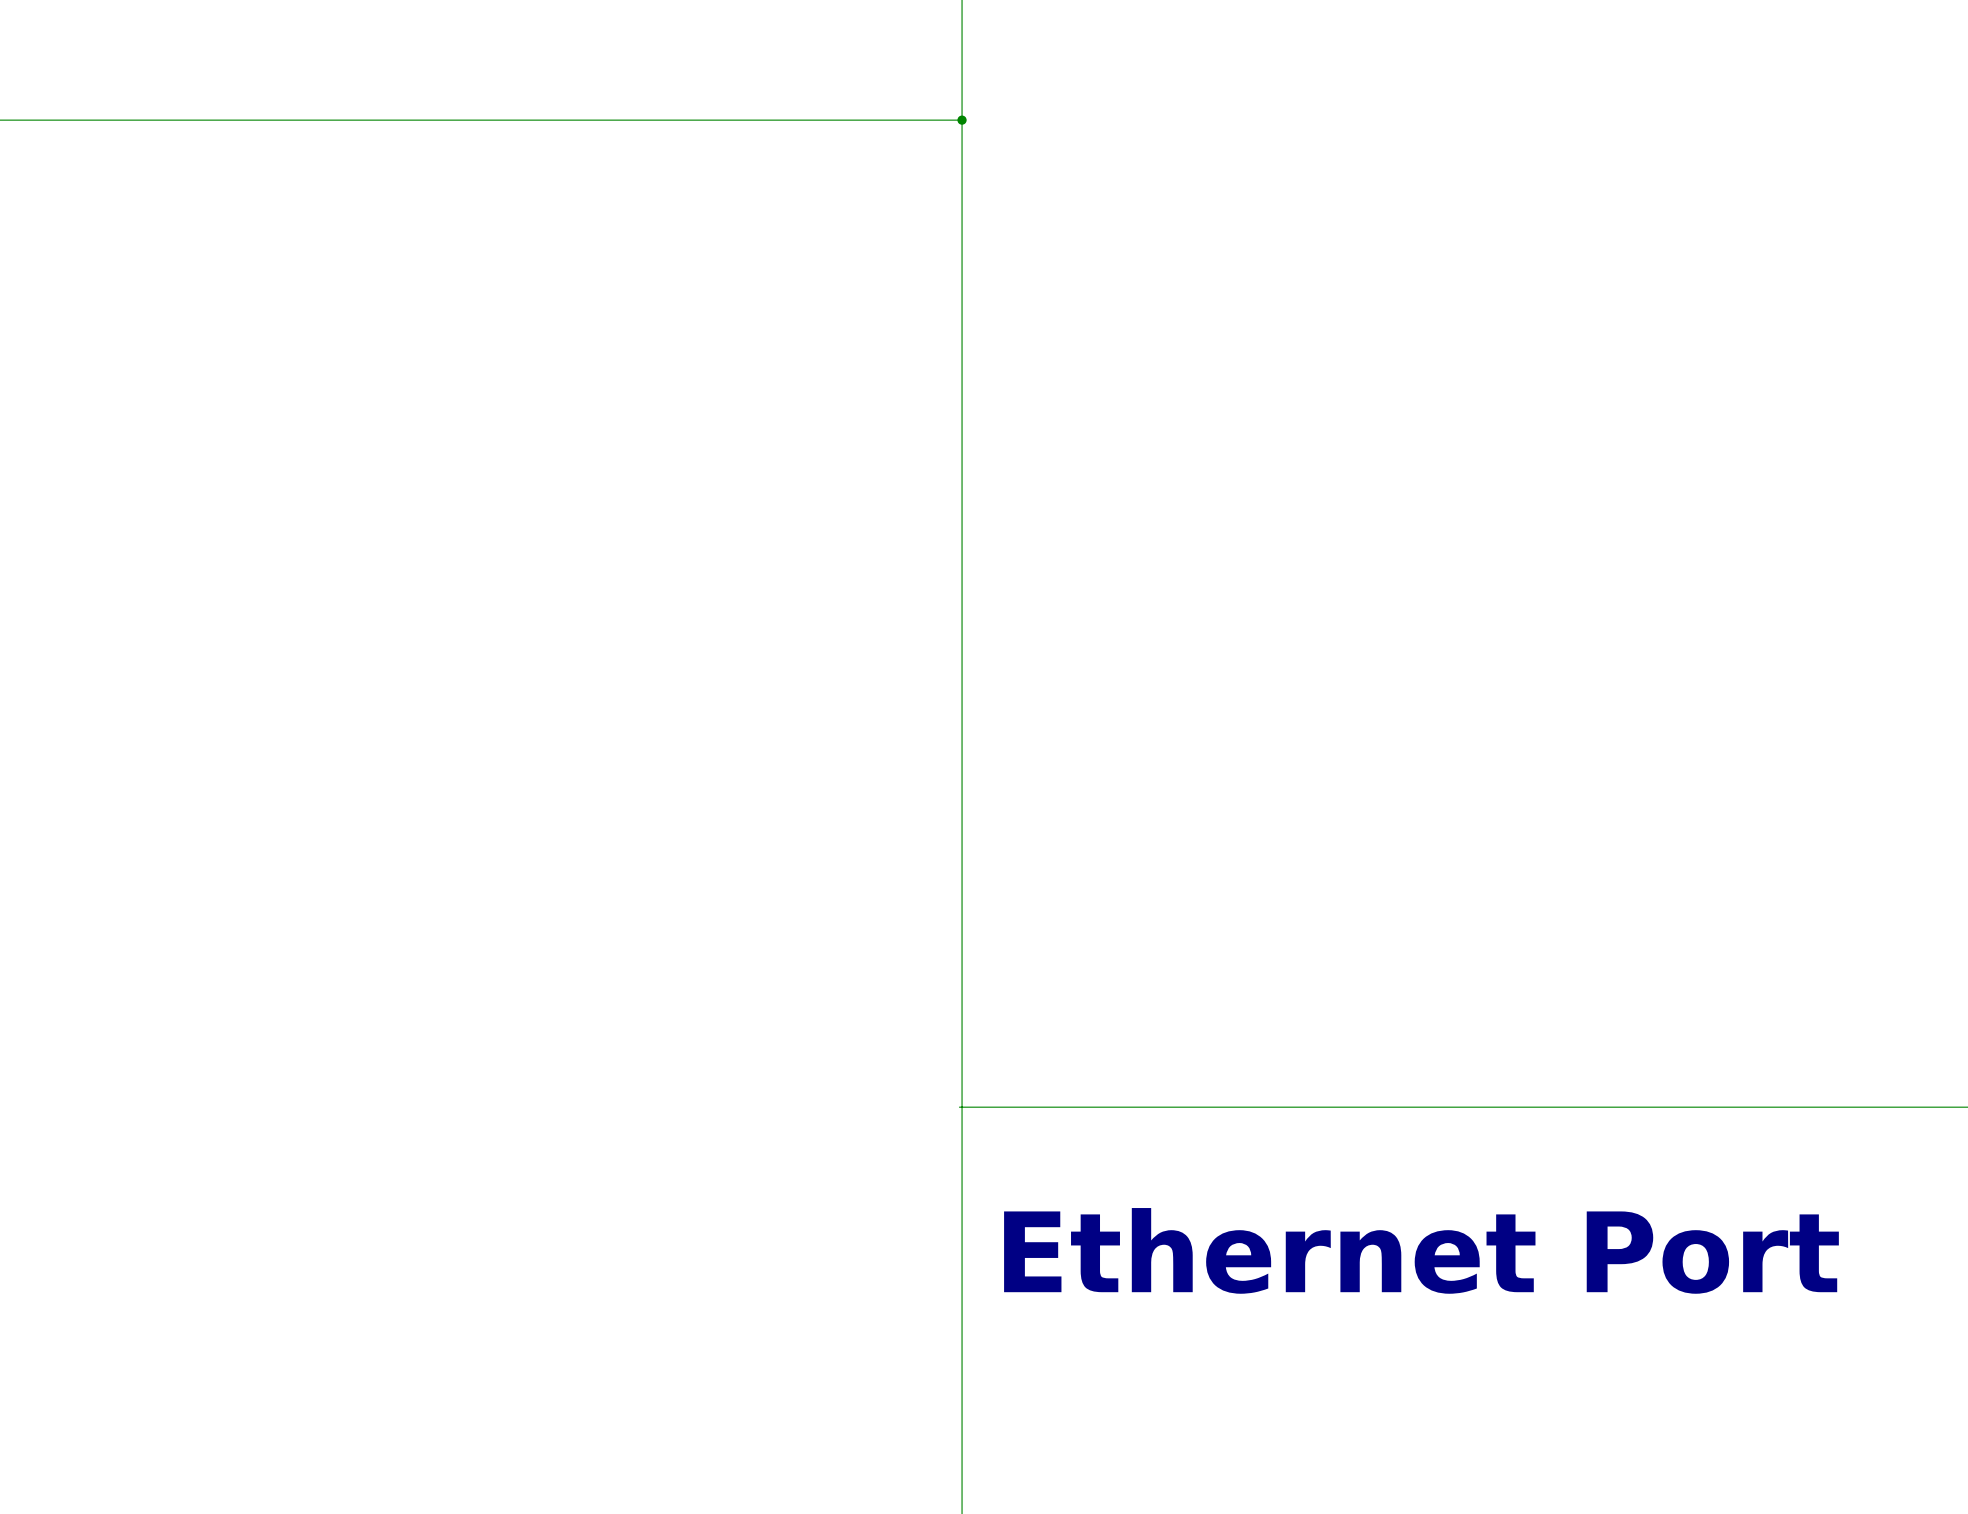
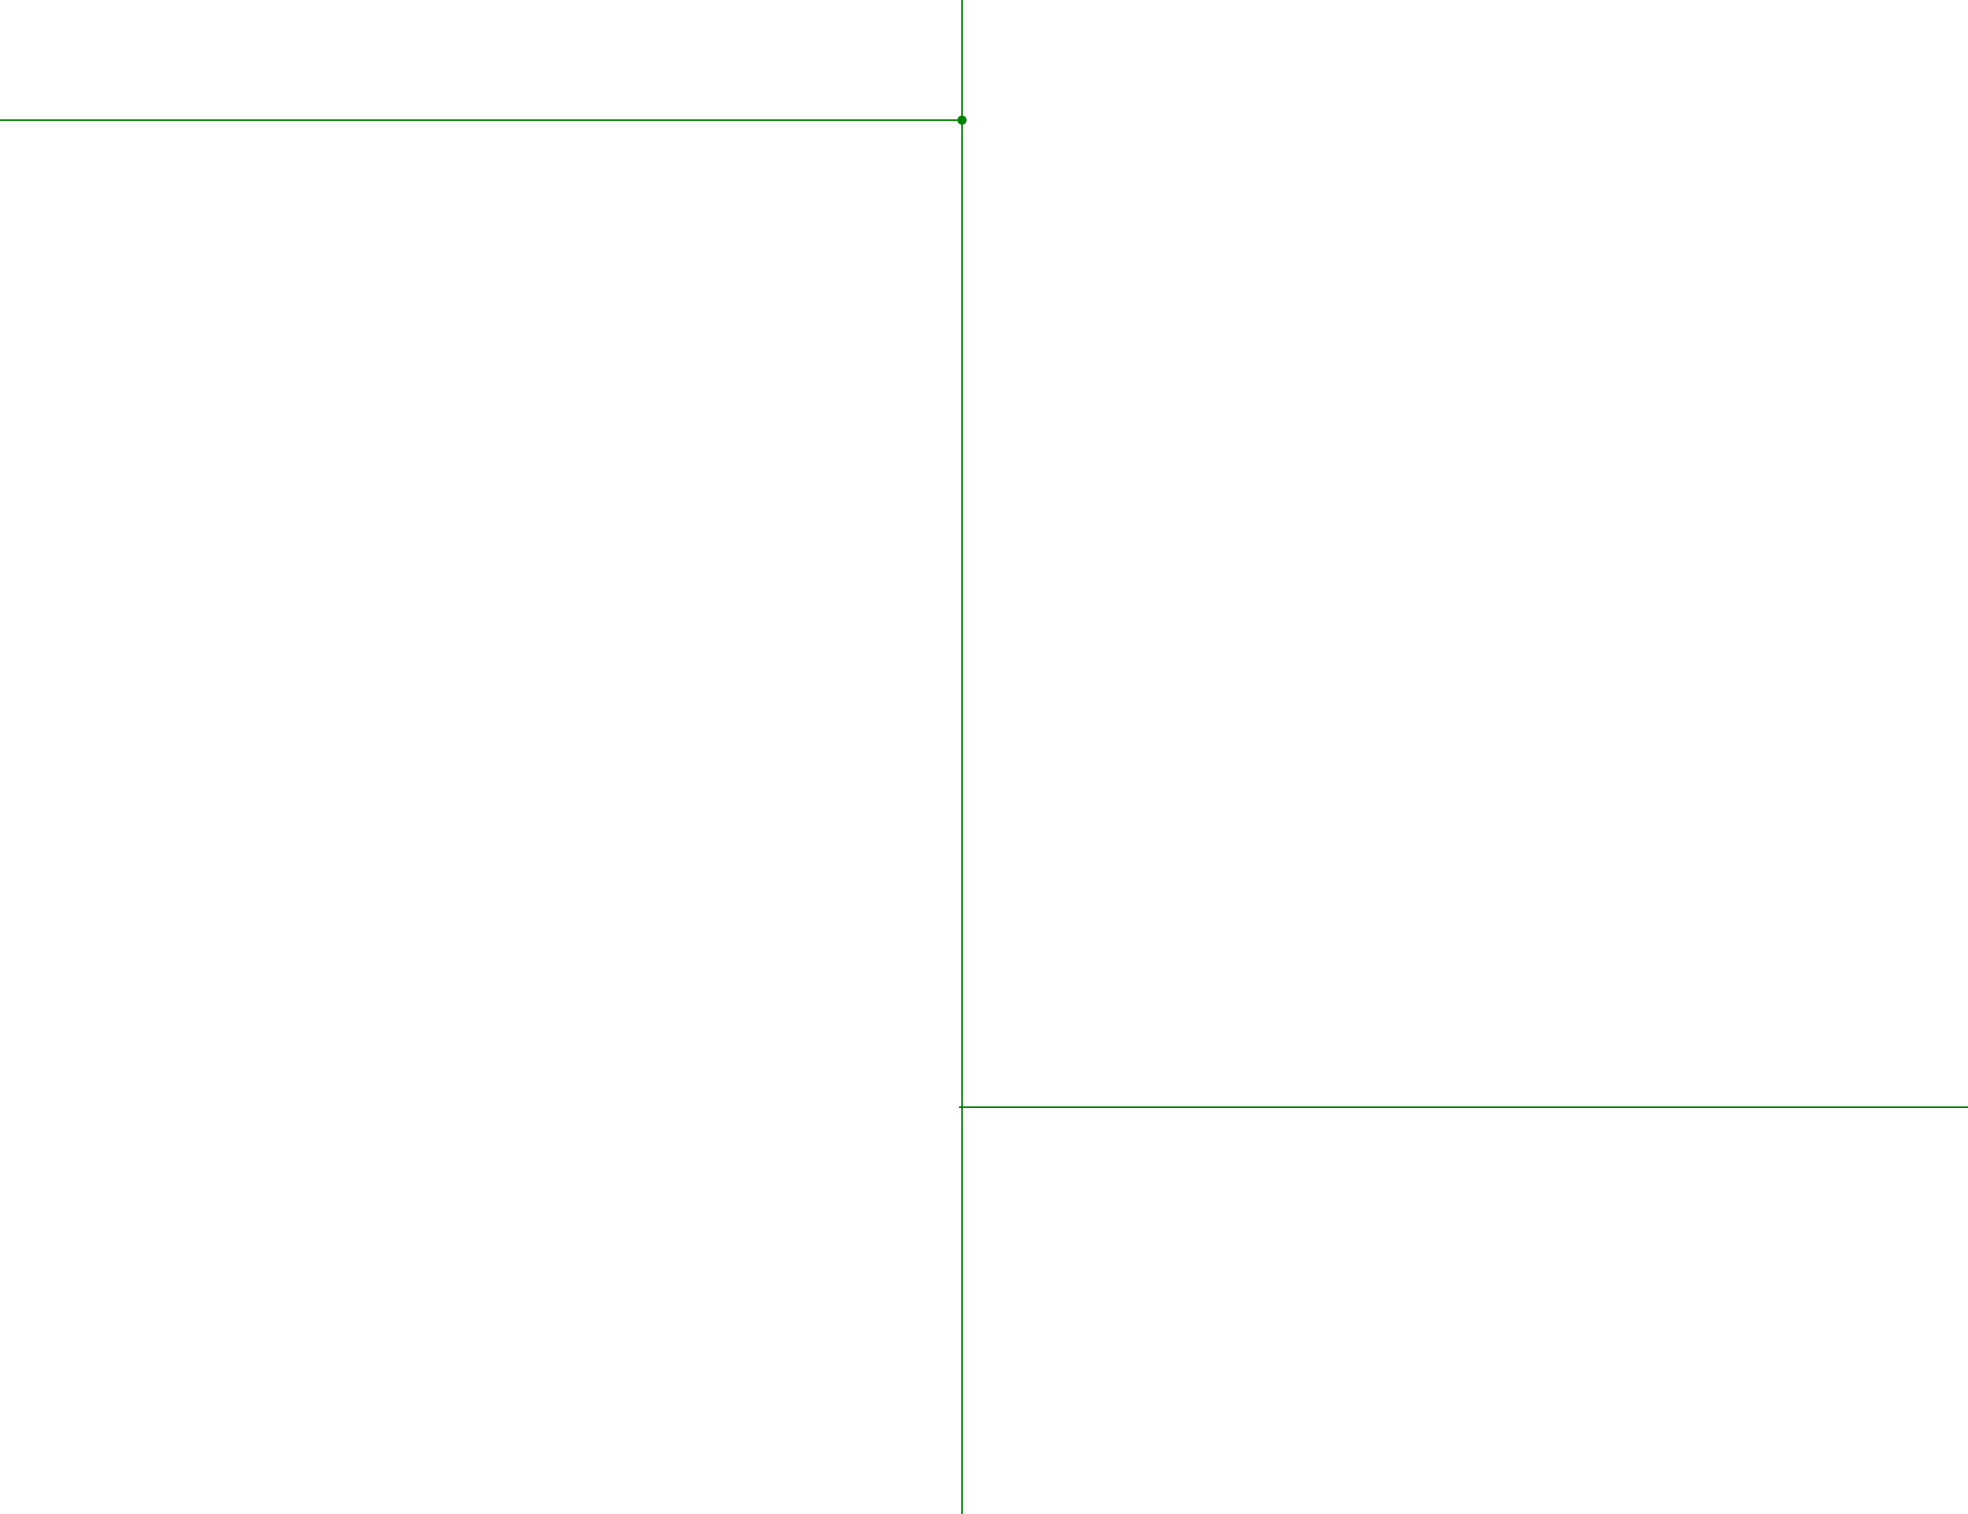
text: Ethernet Port (1421, 1250) -> none

